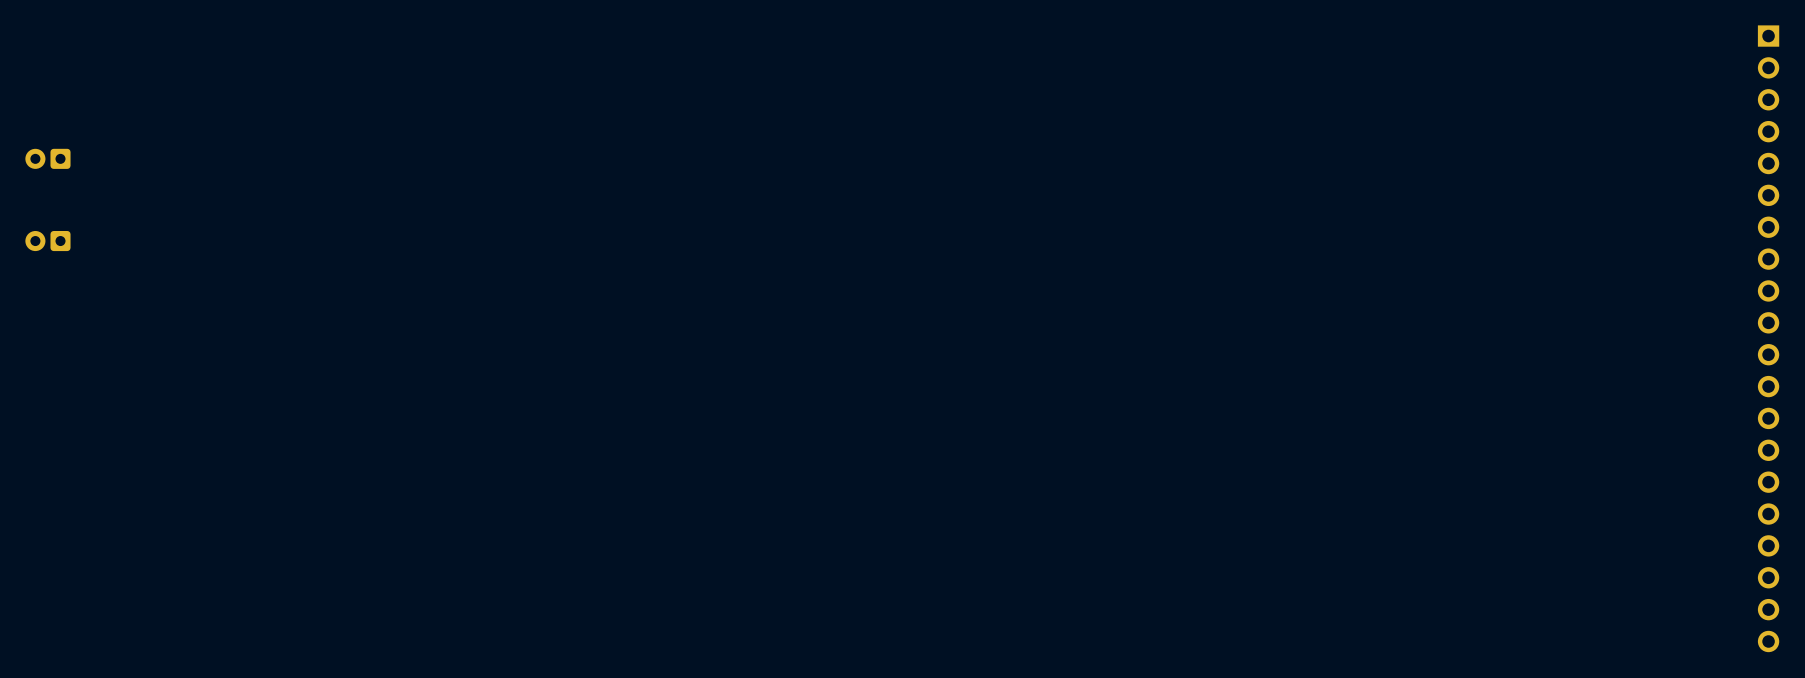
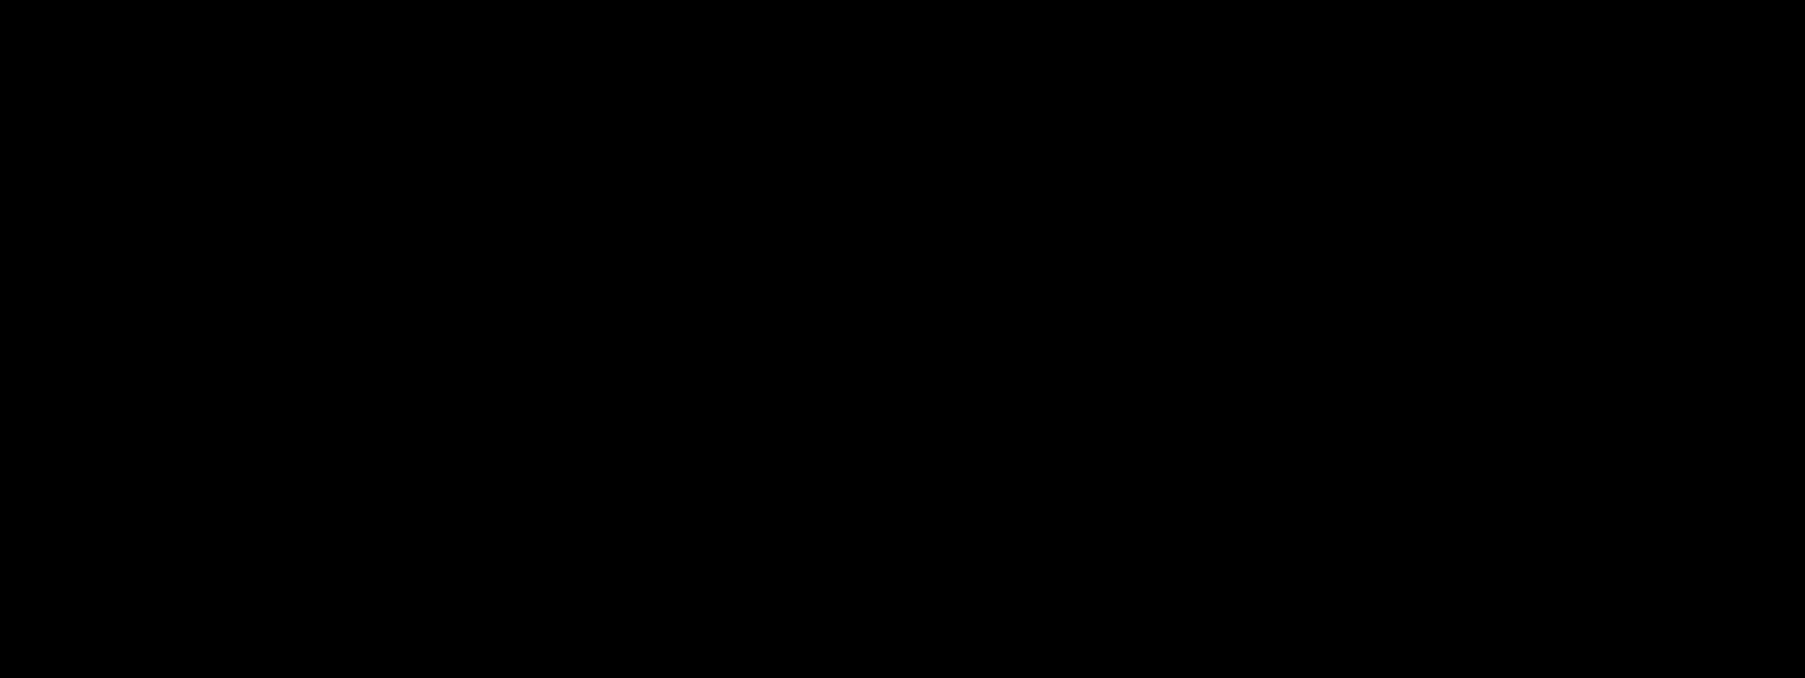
part: (47, 158) -> none
part: (47, 241) -> none
part: (1768, 338) -> none

